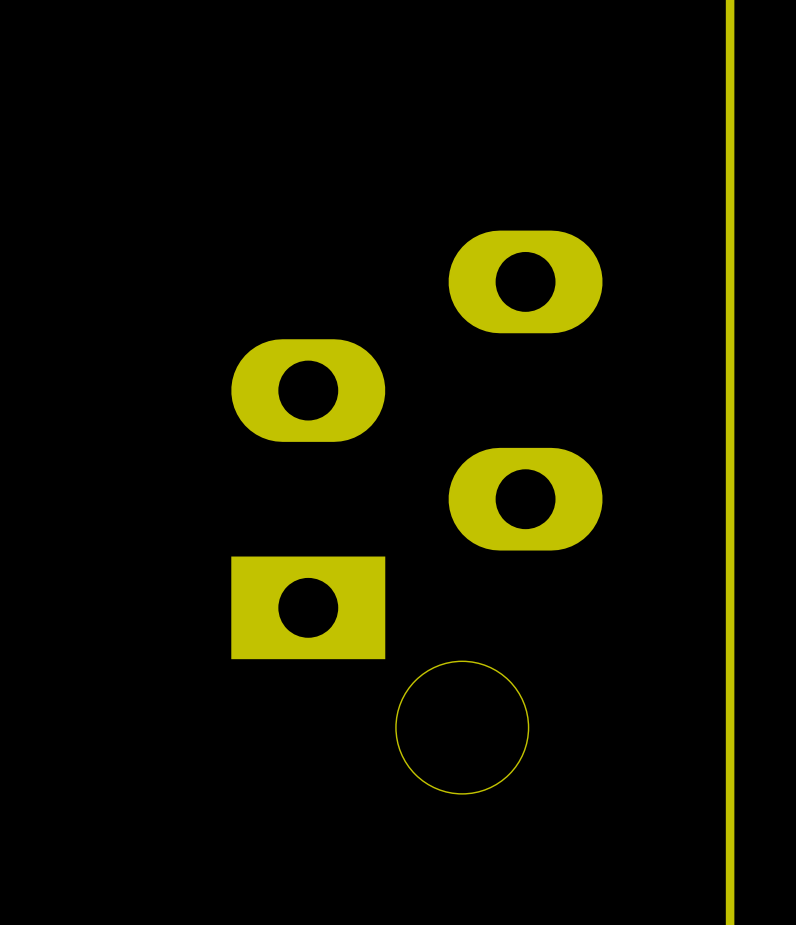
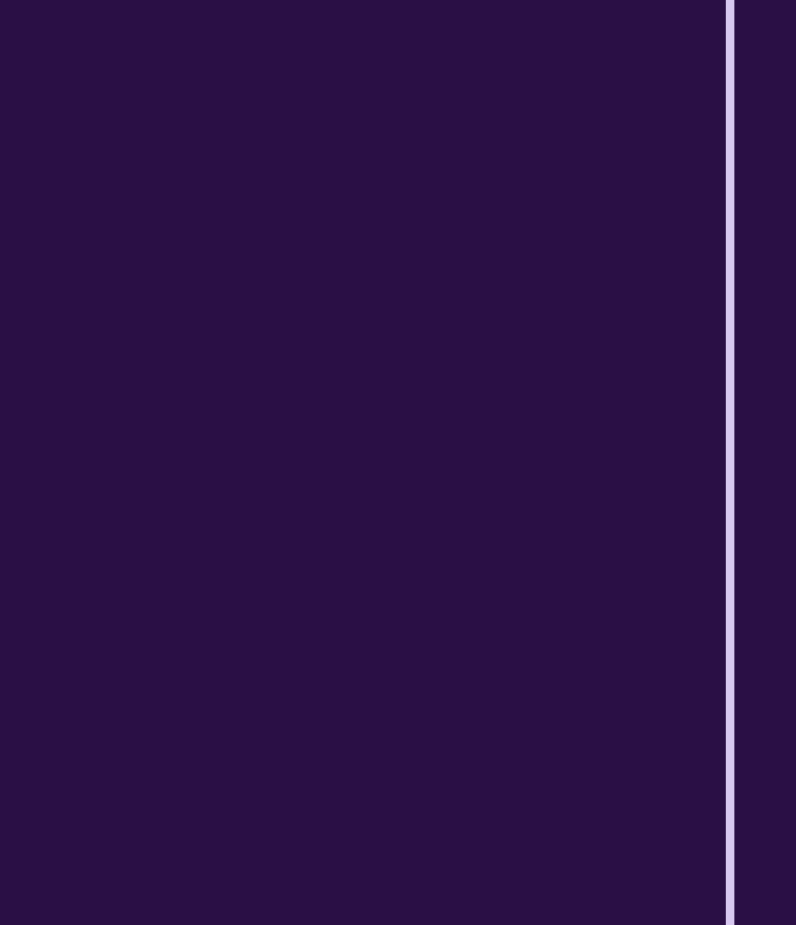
part: (416, 512) -> none

